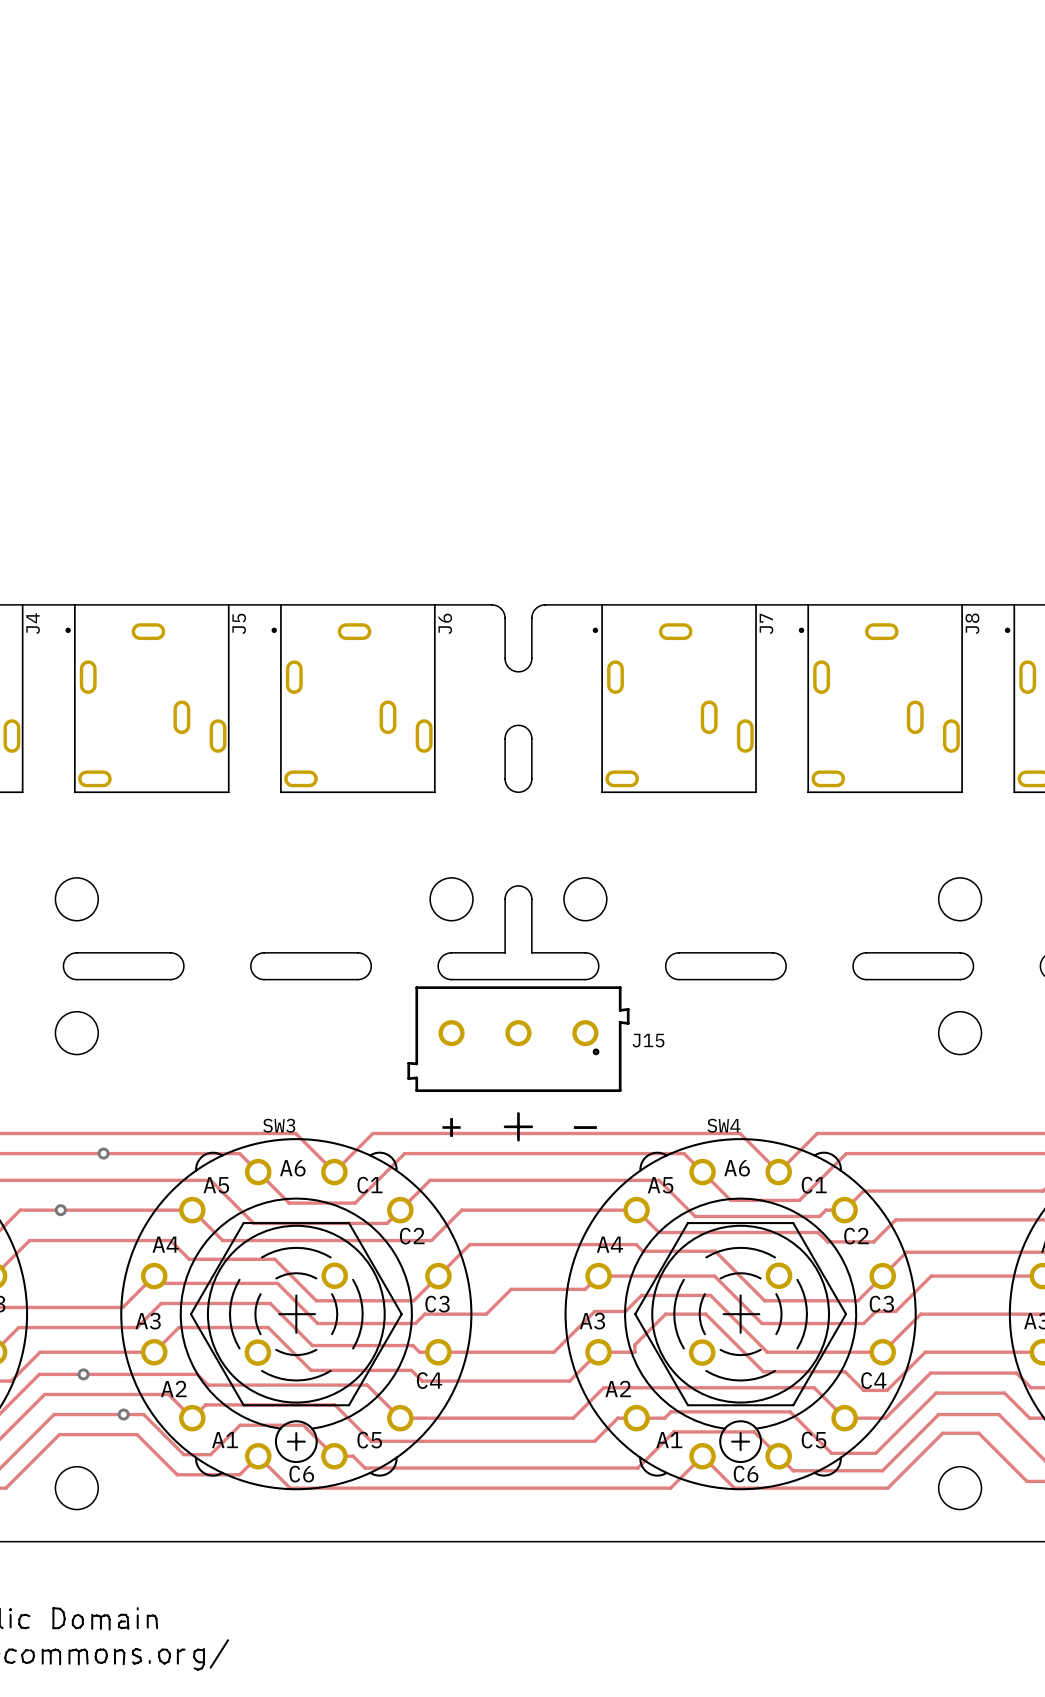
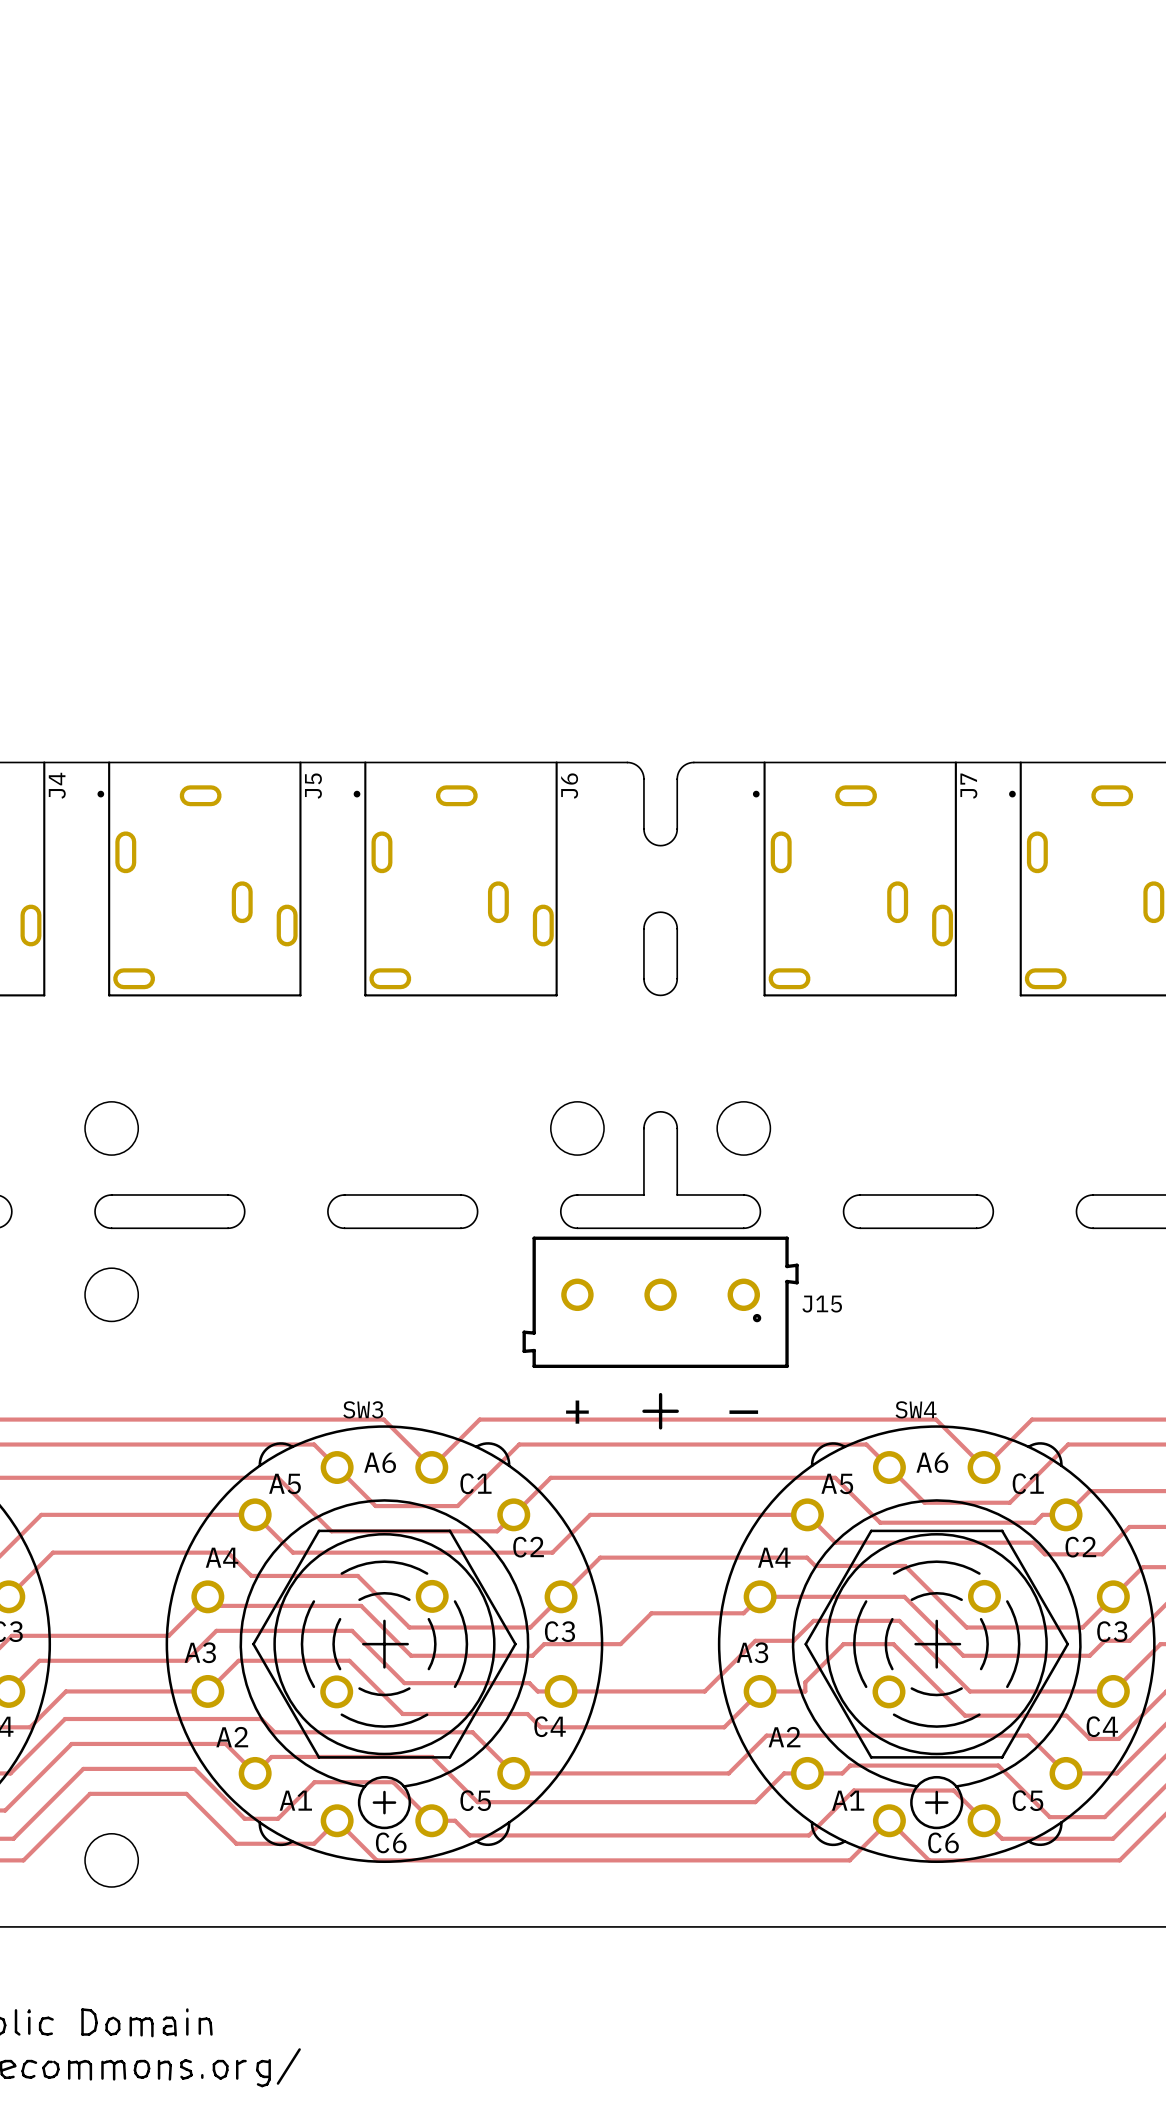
via: (103, 1153) -> none
via: (60, 1210) -> none
via: (83, 1374) -> none
via: (123, 1414) -> none

